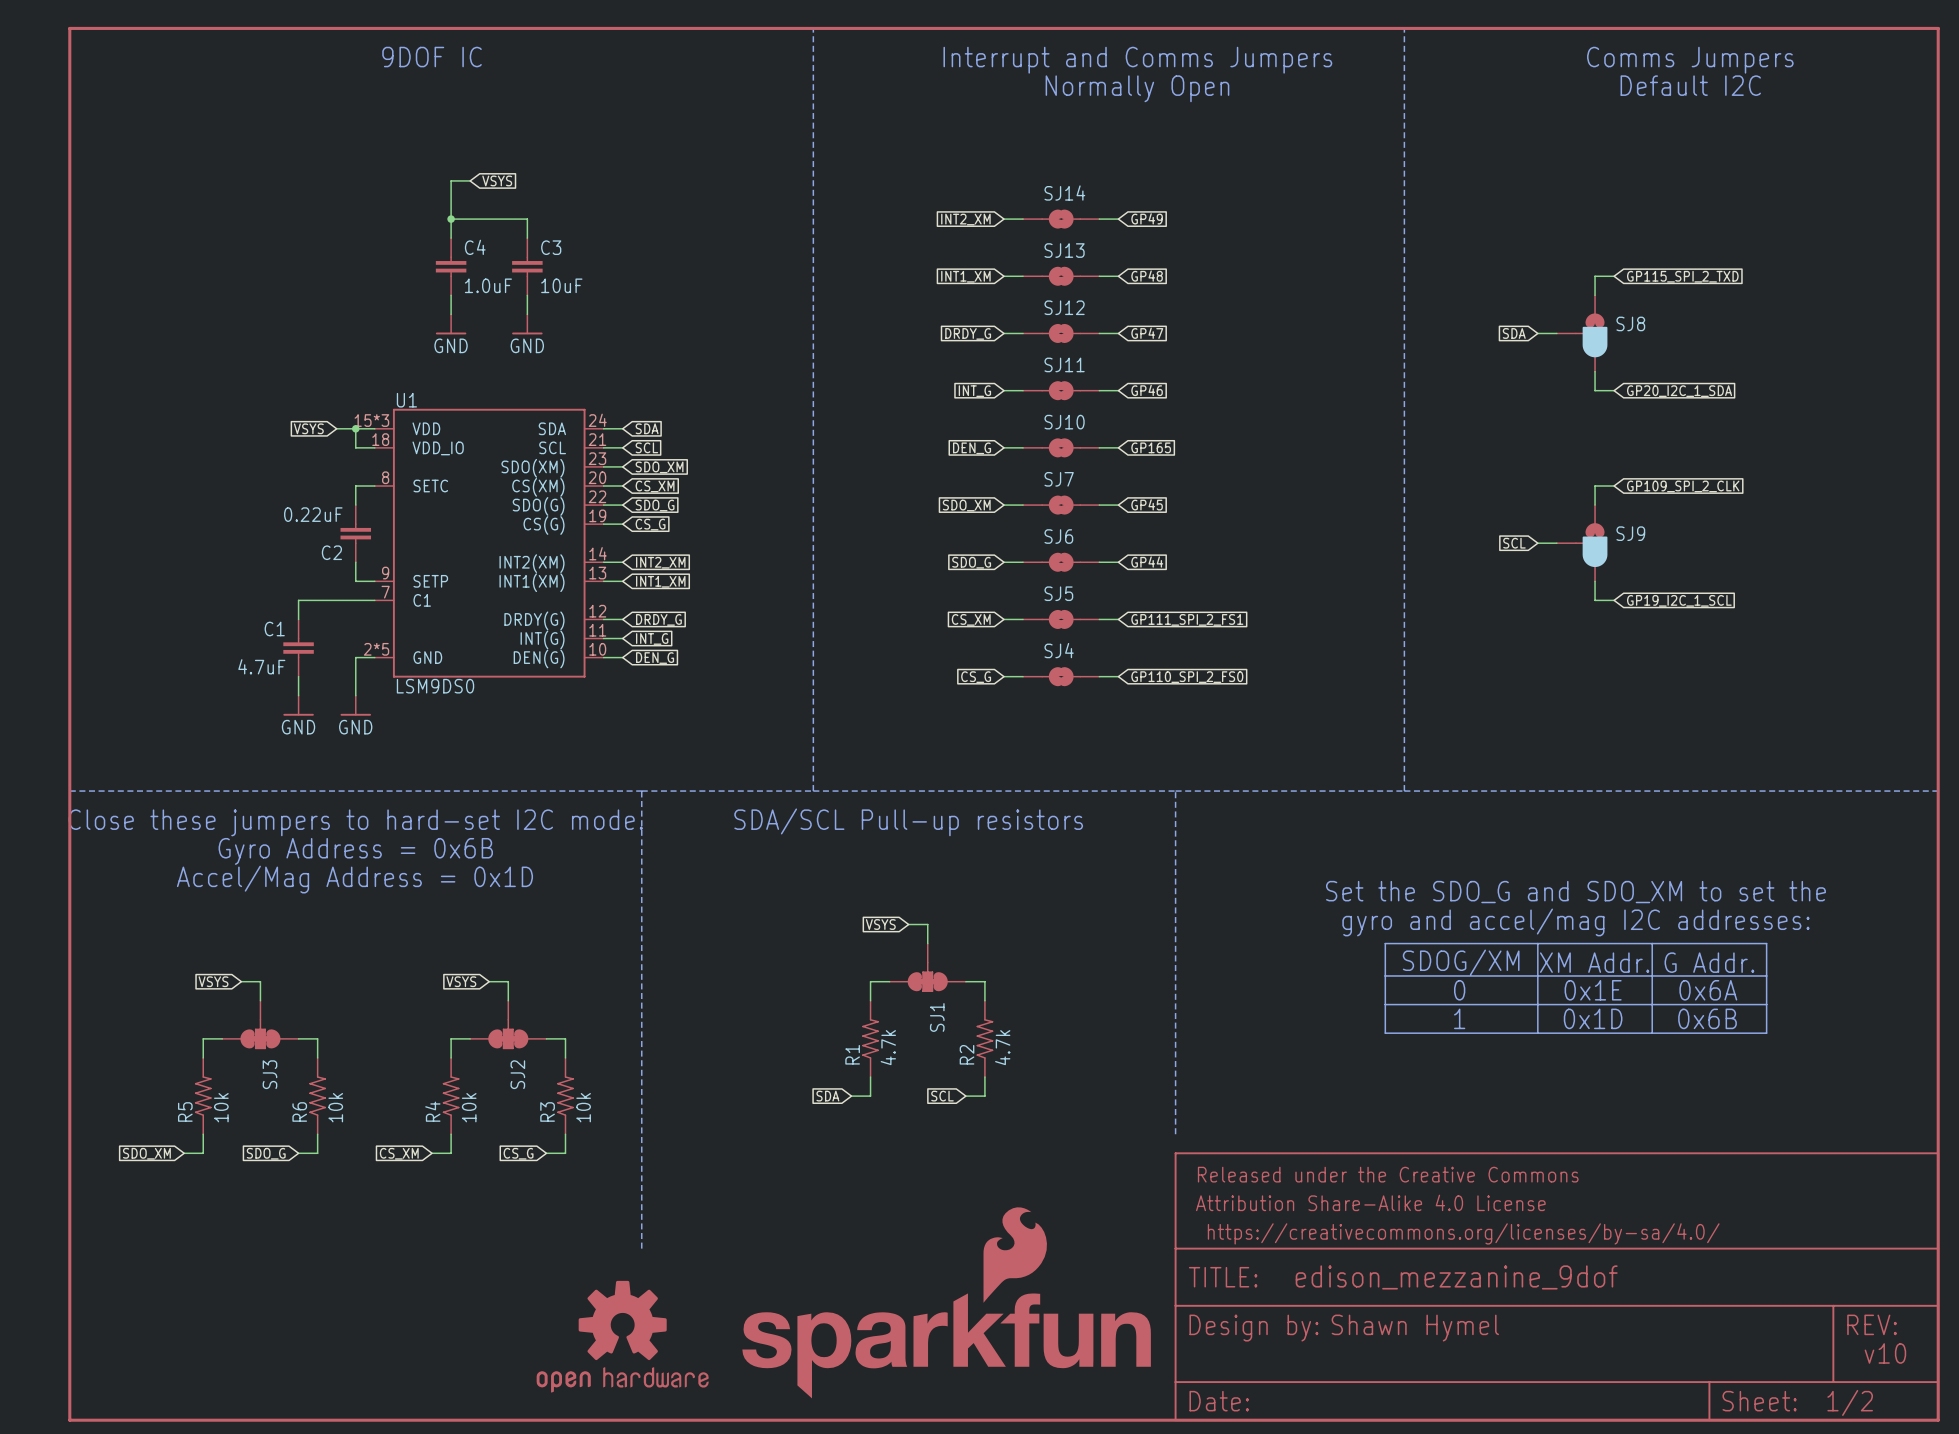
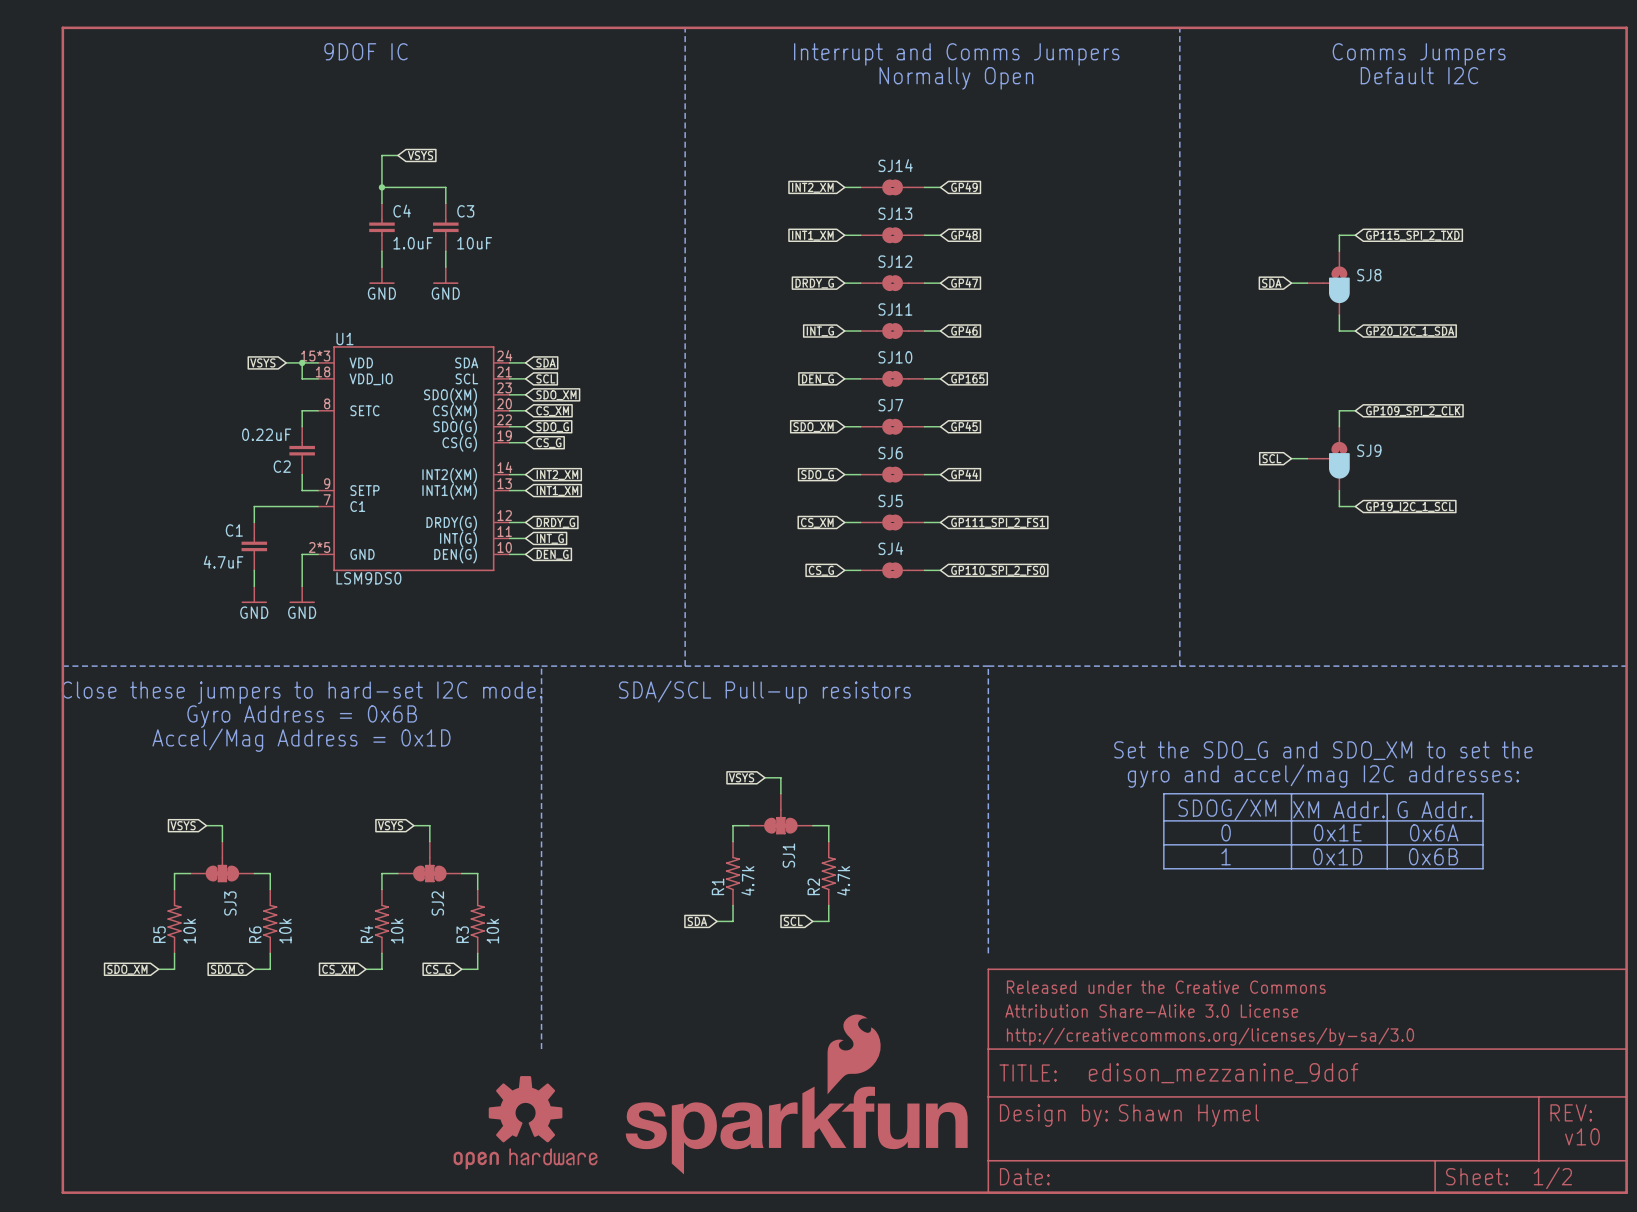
part text: Attribution Share-Alike 4.0 License (1370, 1202) -> Attribution Share-Alike 3.0 License (1151, 1011)
part text: https://creativecommons.org/licenses/by-sa/4.0/ (1463, 1233) -> http://creativecommons.org/licenses/by-sa/3.0 (1210, 1036)

